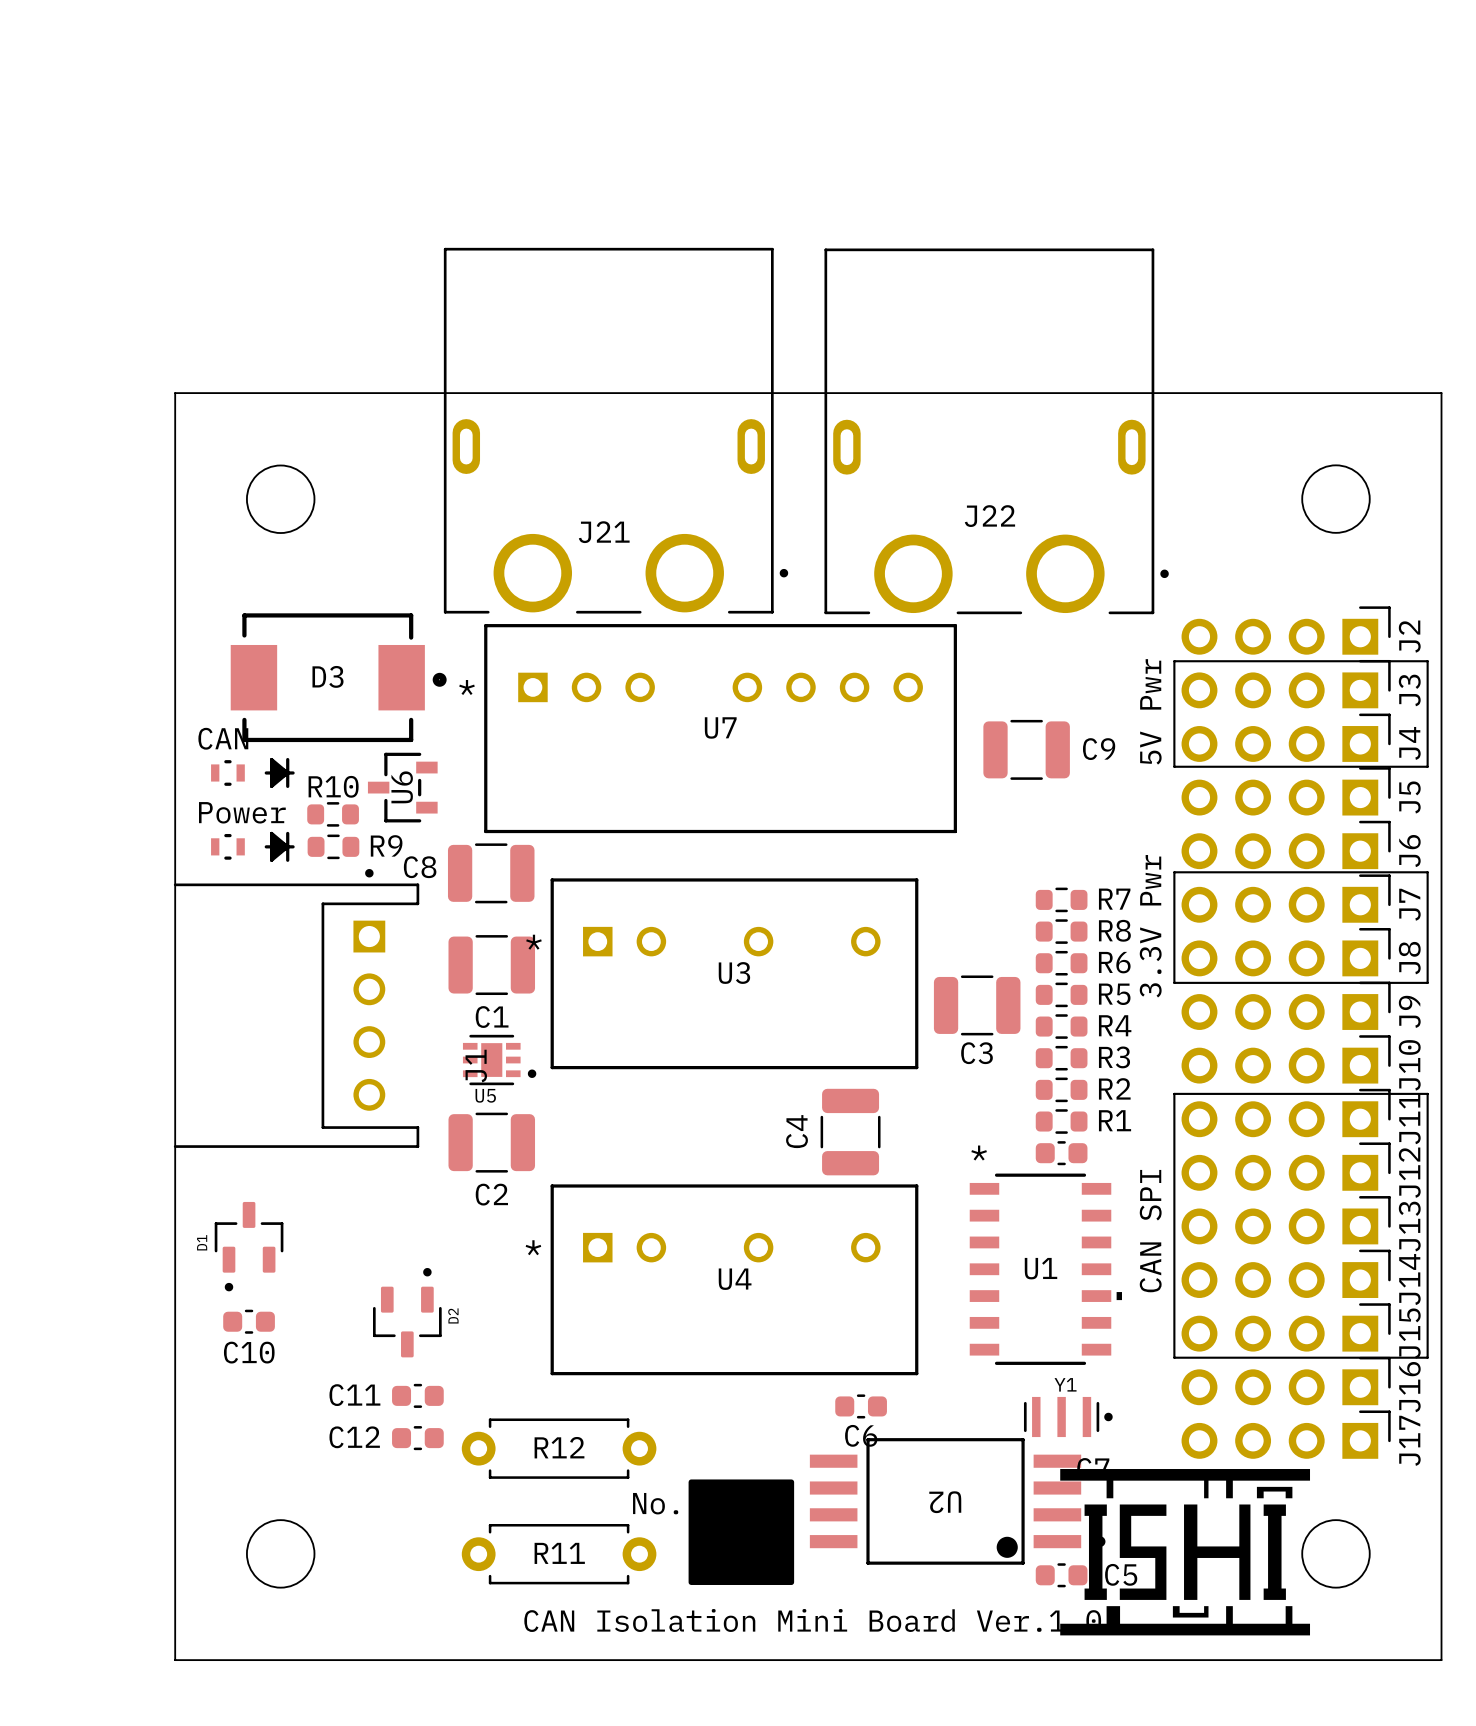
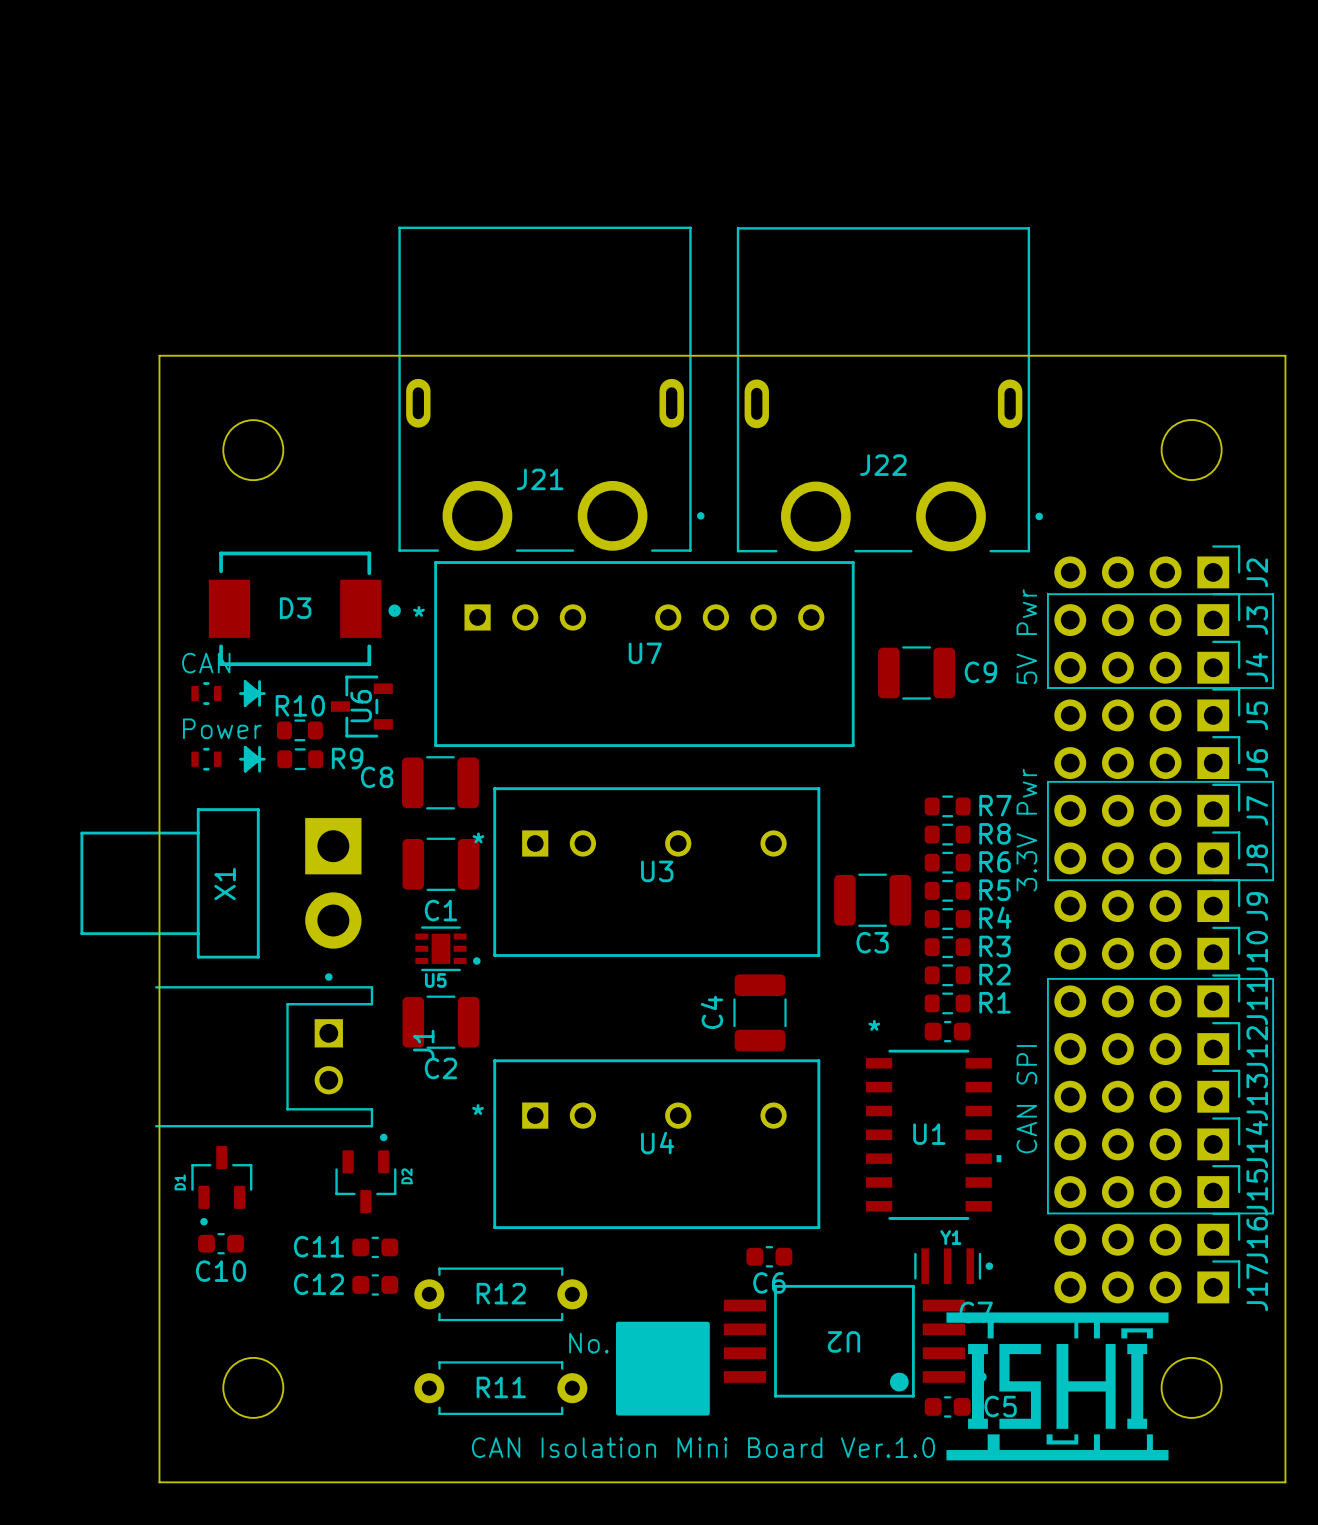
J1 footprint: [173, 869, 420, 1148] -> [154, 973, 374, 1128]
X1: none -> (220, 883)
J1 name position: J1 (476, 1066) -> J1 (423, 1044)
D1 position: (249, 1246) -> (221, 1185)
C10 position: (249, 1321) -> (221, 1243)

